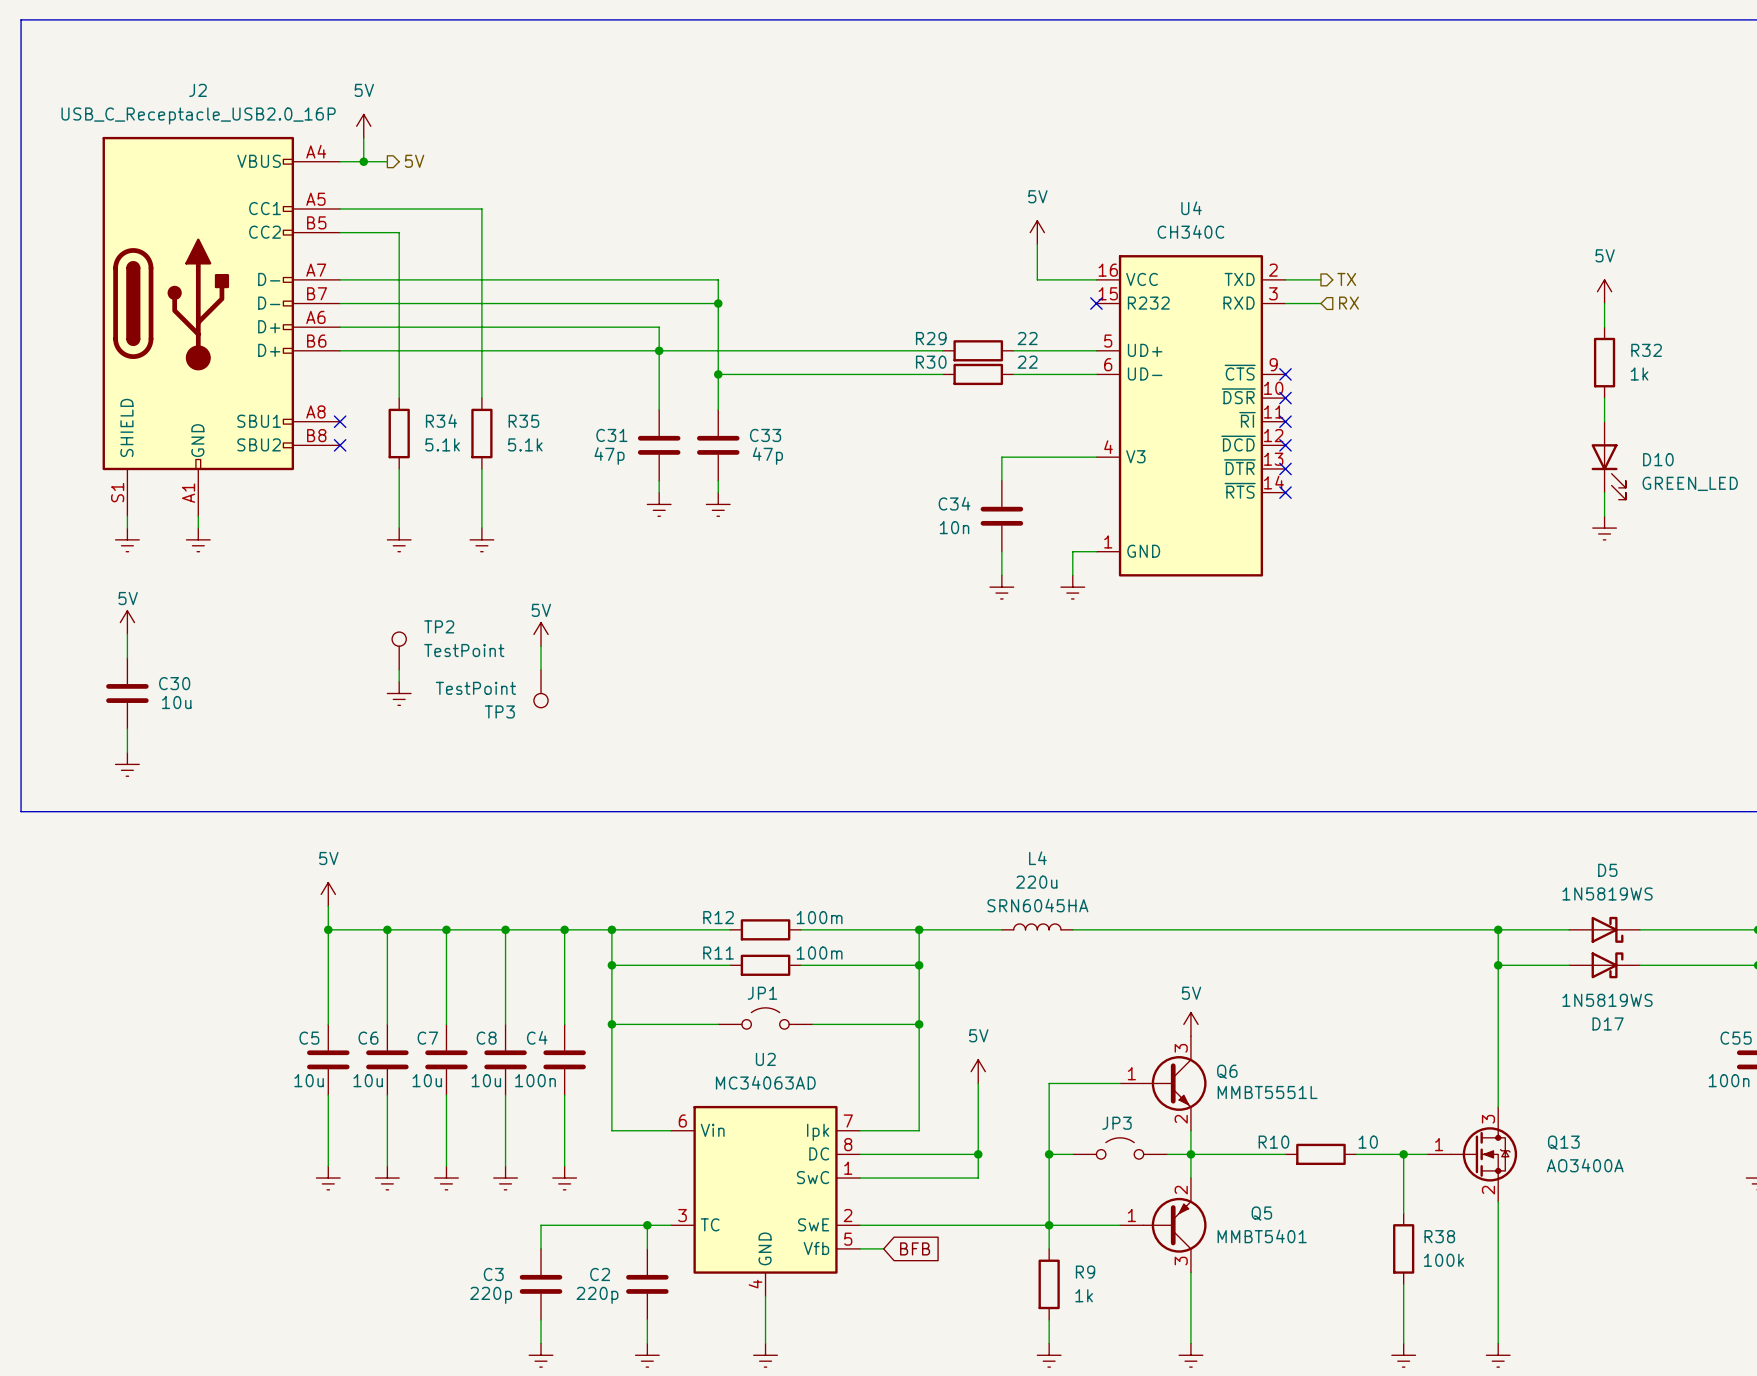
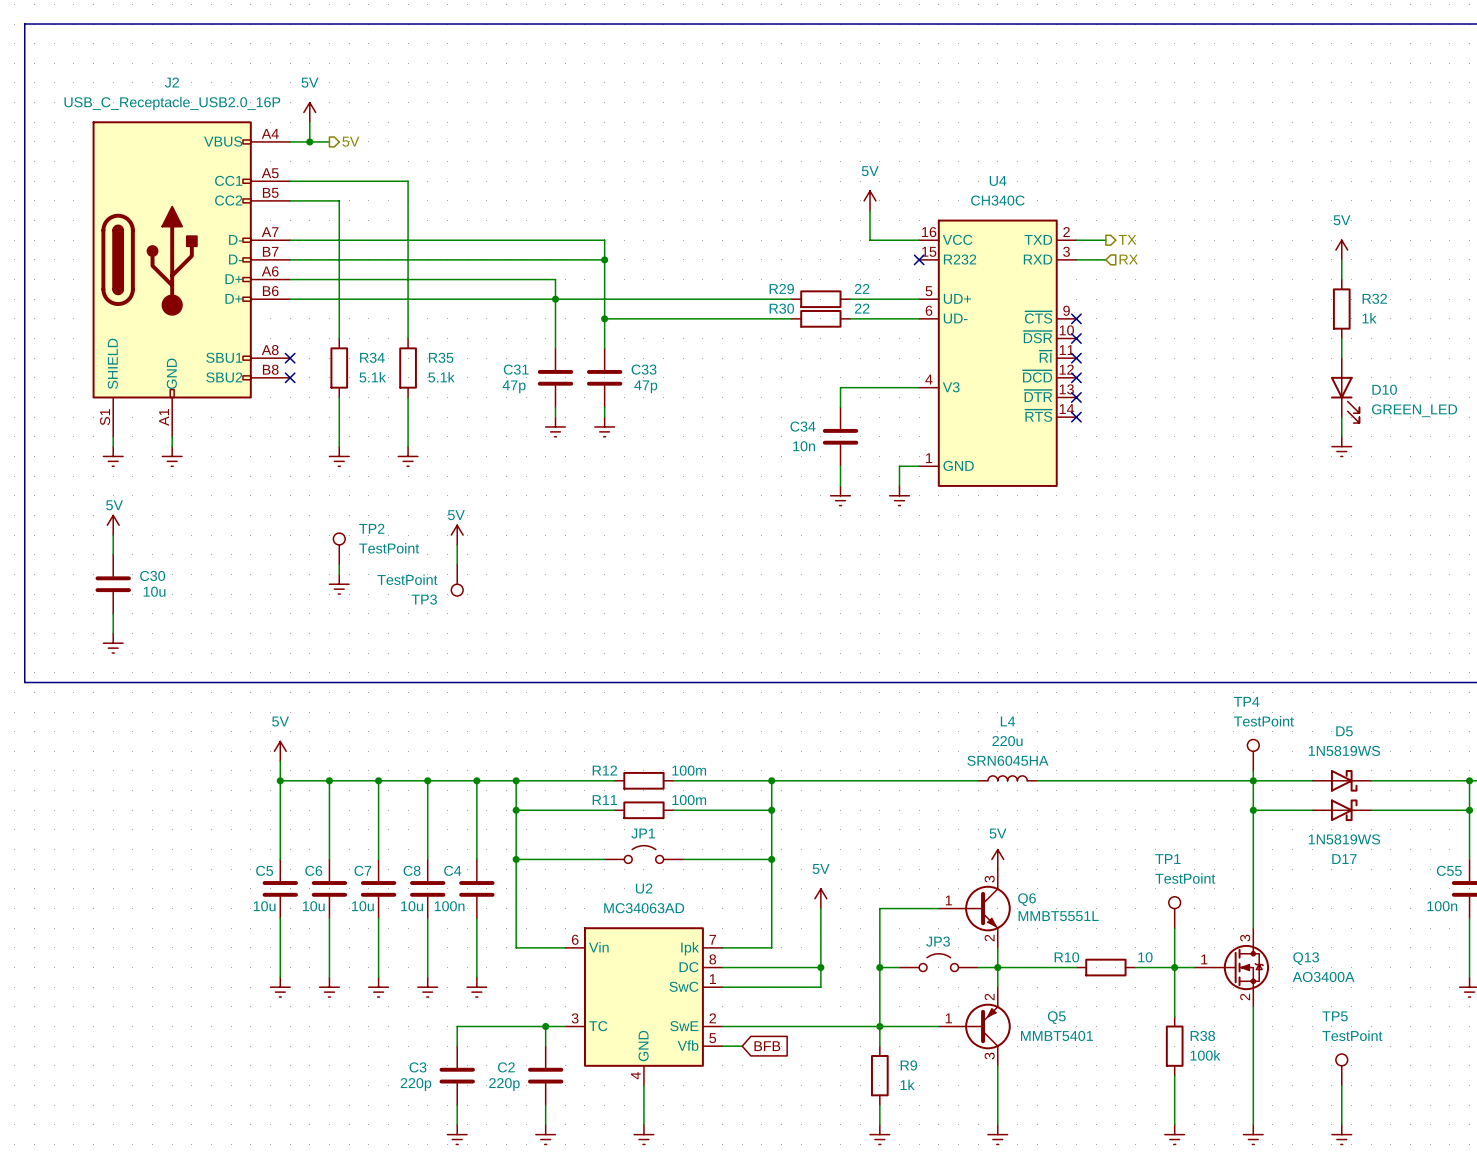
TP4: none -> TestPoint (1253, 755)
wire: none -> (1253, 770) (1253, 780)
L4 position: (1037, 926) -> (1007, 778)
wire: (1167, 929) (1238, 929) -> (840, 780) (899, 780)
TP1: none -> TestPoint (1174, 912)
wire: none -> (1174, 928) (1174, 967)
TP5: none -> TestPoint (1341, 1069)
wire: none -> (1341, 1085) (1341, 1124)
power symbol: none -> (1341, 1134)

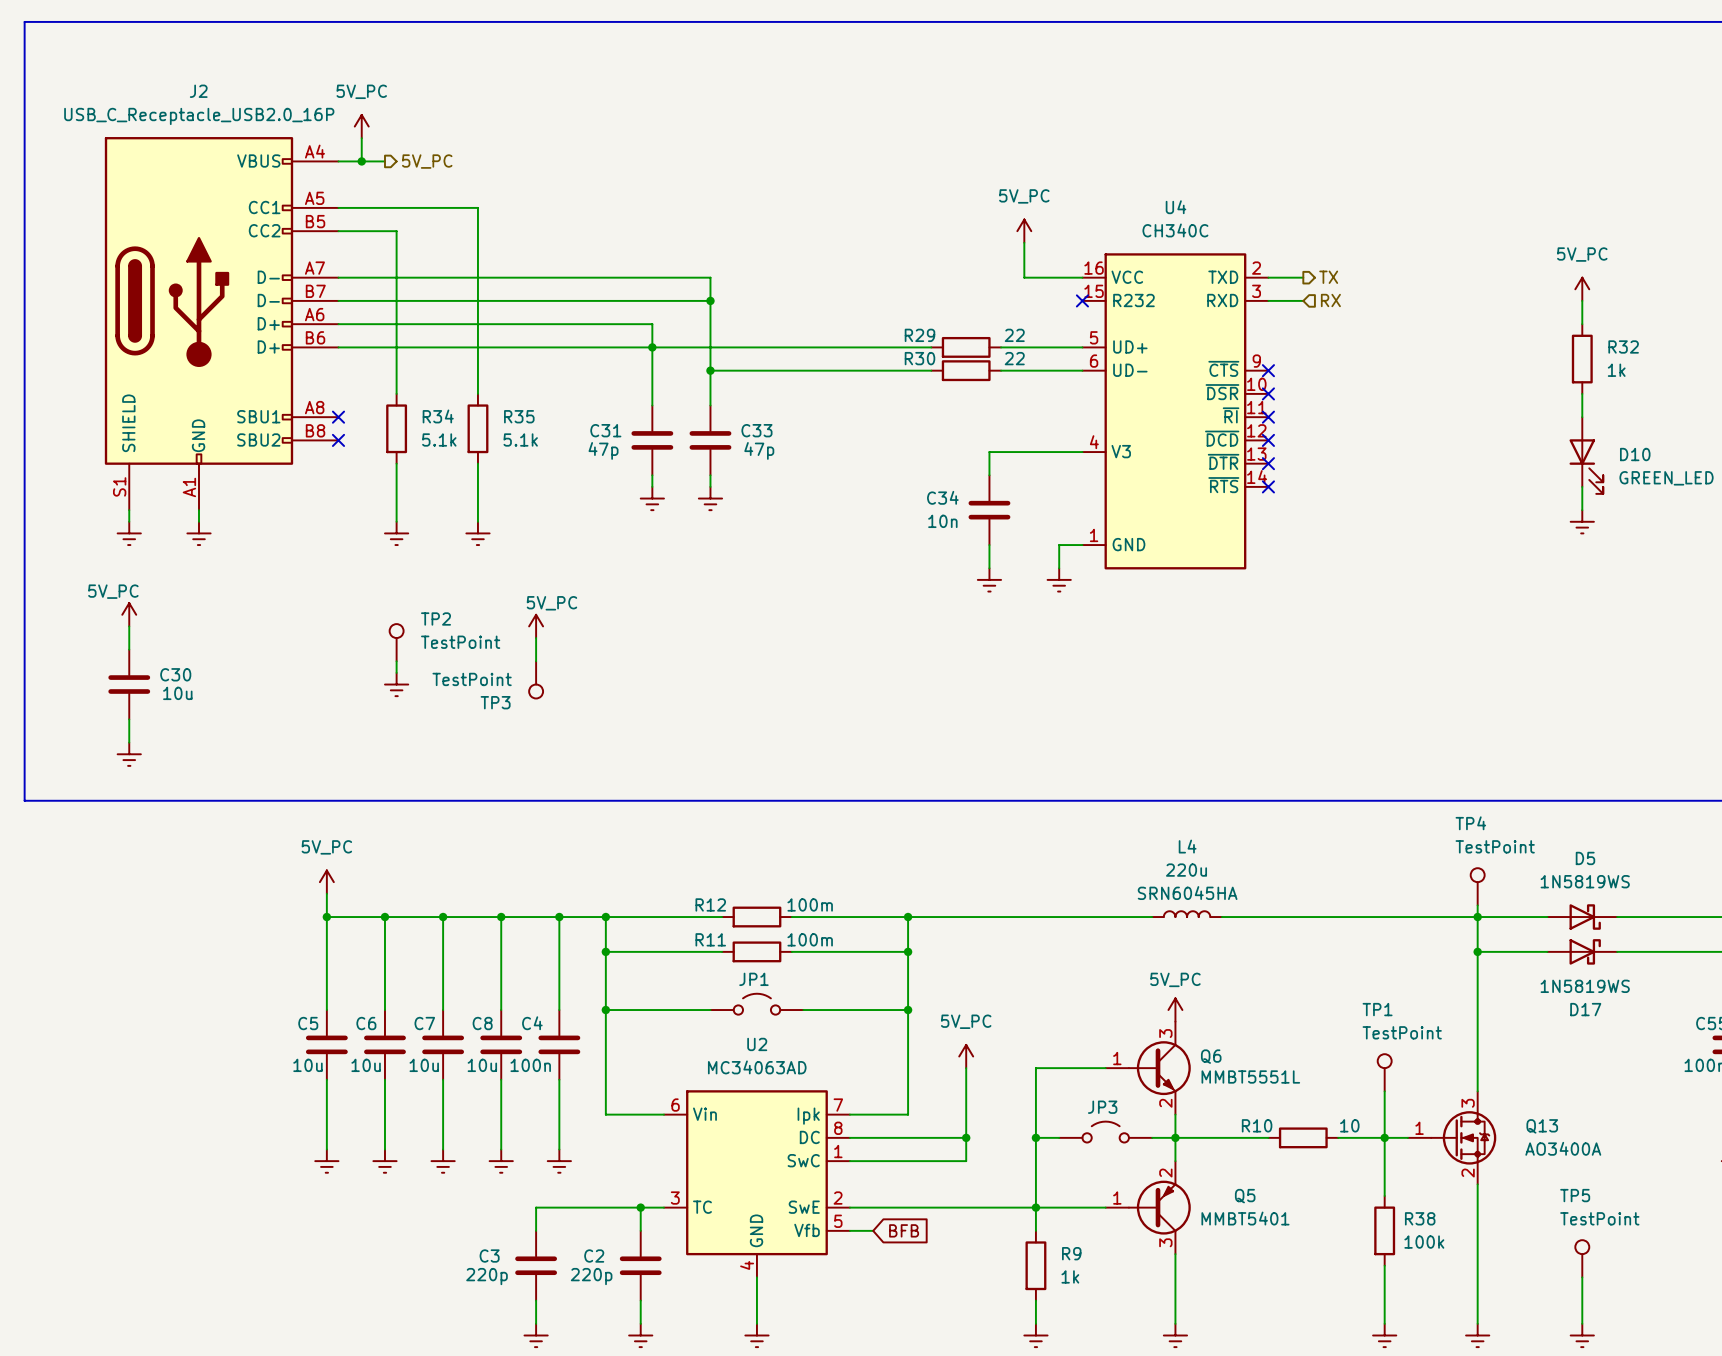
power symbol: 5V (309, 112) -> 5V_PC (361, 126)
hierarchical label: 5V (350, 141) -> 5V_PC (427, 161)
power symbol: 5V (870, 200) -> 5V_PC (1024, 231)
power symbol: 5V (1341, 250) -> 5V_PC (1582, 289)
power symbol: 5V (113, 525) -> 5V_PC (129, 614)
power symbol: 5V (457, 535) -> 5V_PC (536, 626)
power symbol: 5V (280, 751) -> 5V_PC (326, 882)
power symbol: 5V (997, 859) -> 5V_PC (1175, 1010)
power symbol: 5V (820, 898) -> 5V_PC (966, 1056)

